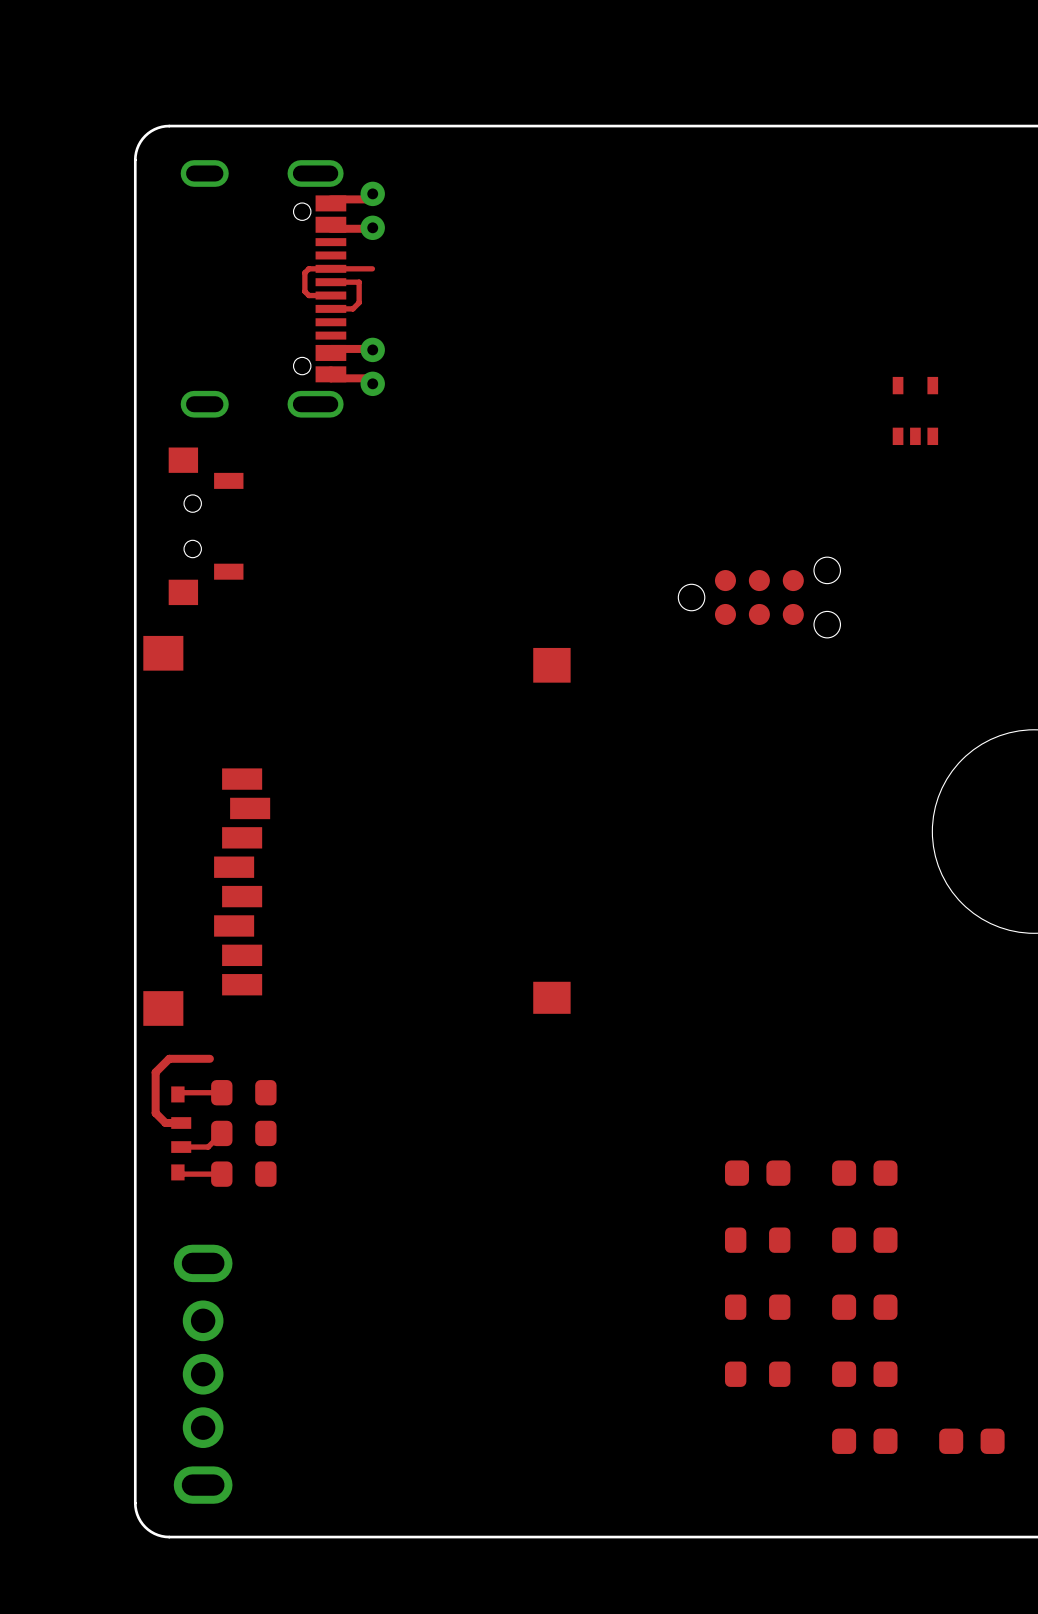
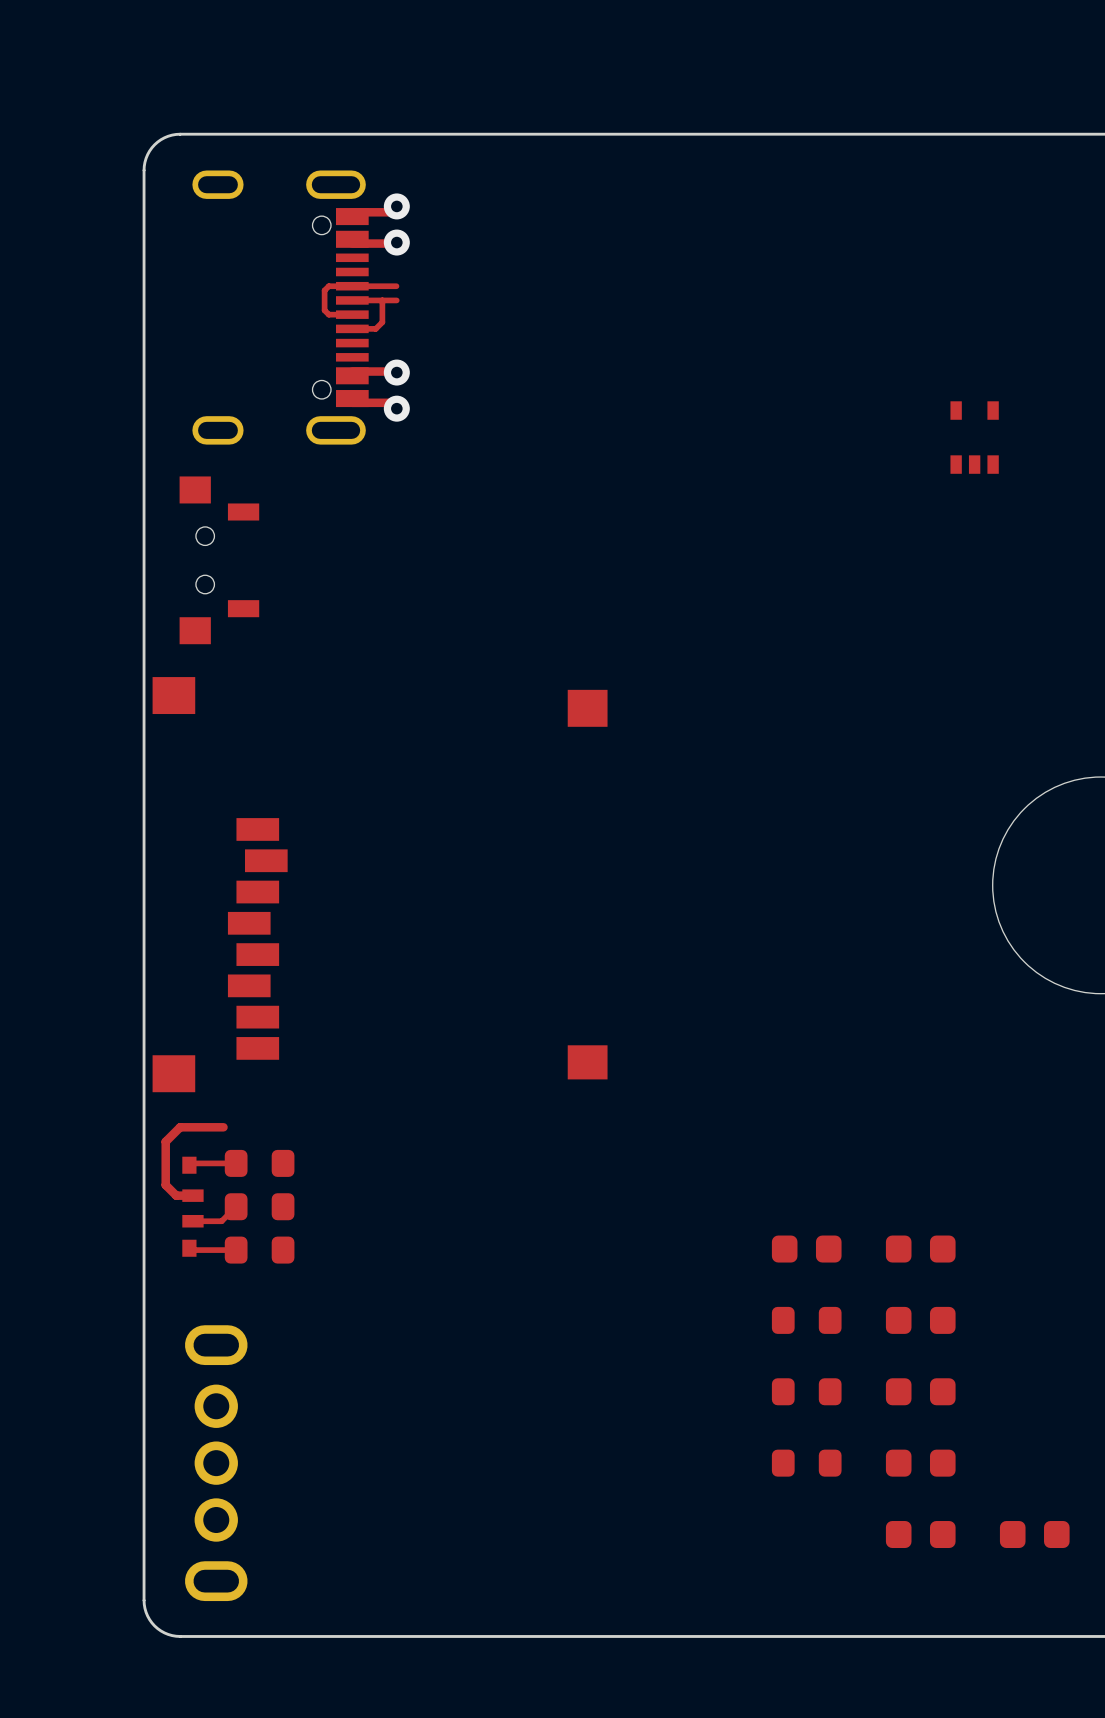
top track: none -> (396, 300) (382, 300)
part: (759, 597) -> none

